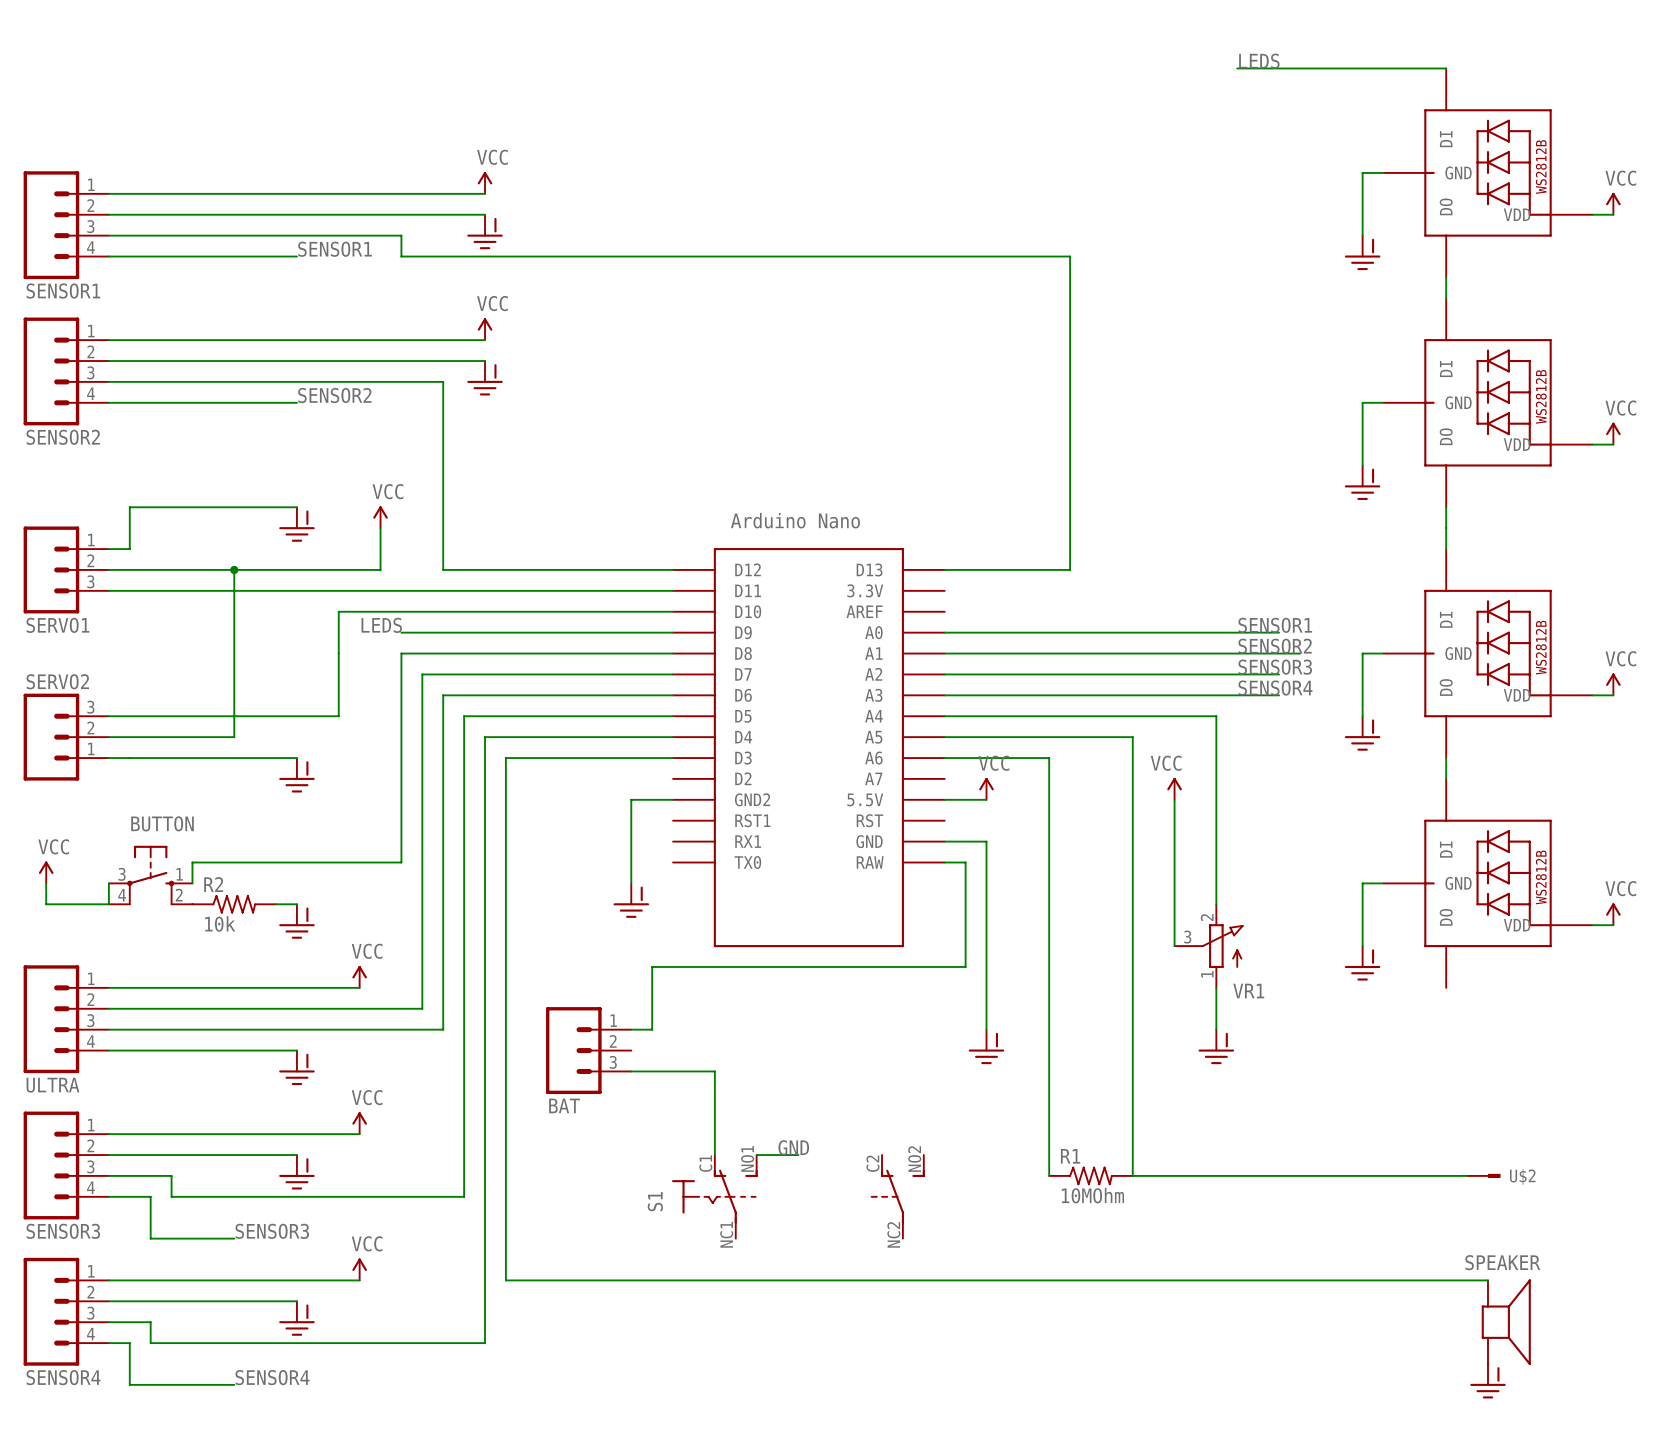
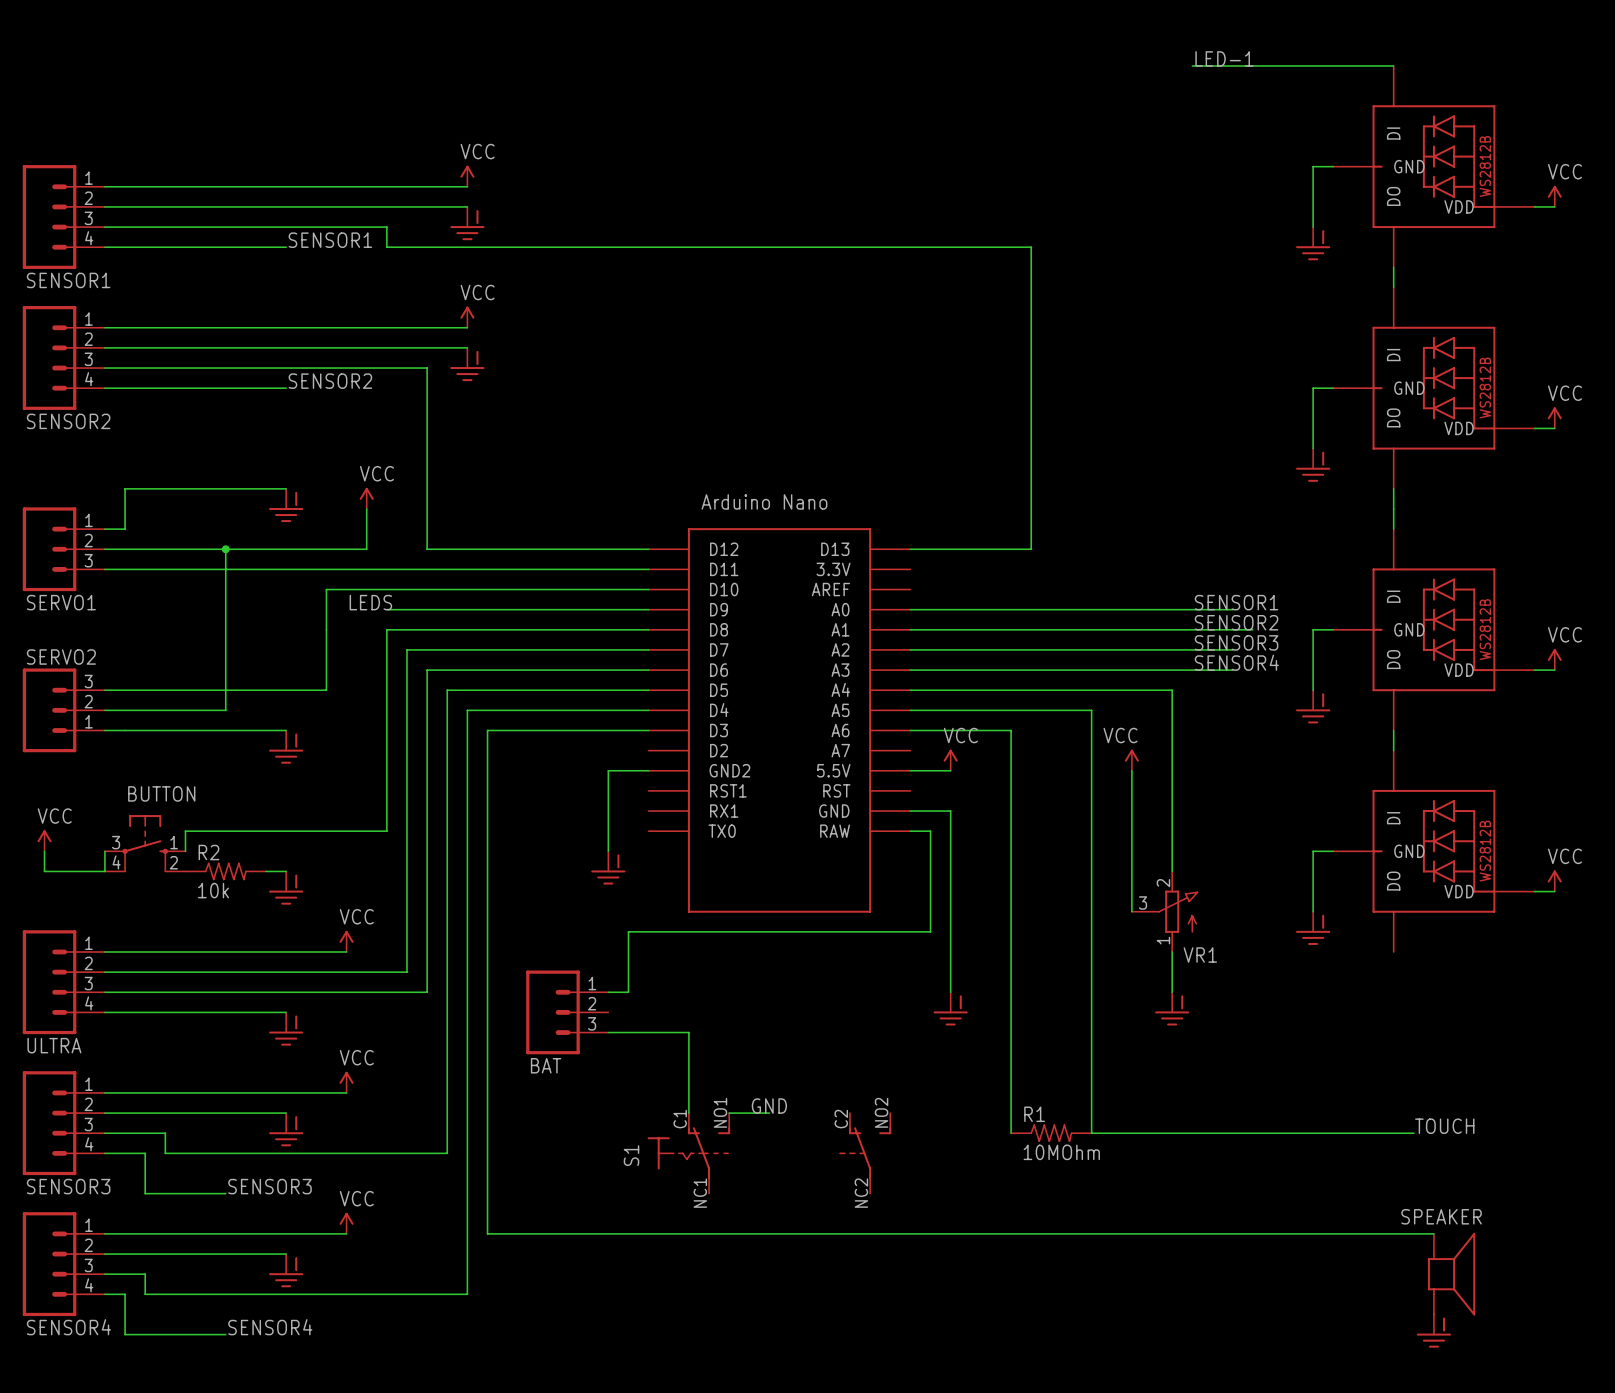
label: LEDS (1259, 61) -> LED-1 (1224, 58)
label: none -> TOUCH (1444, 1126)
U$2: (1483, 1175) -> none

